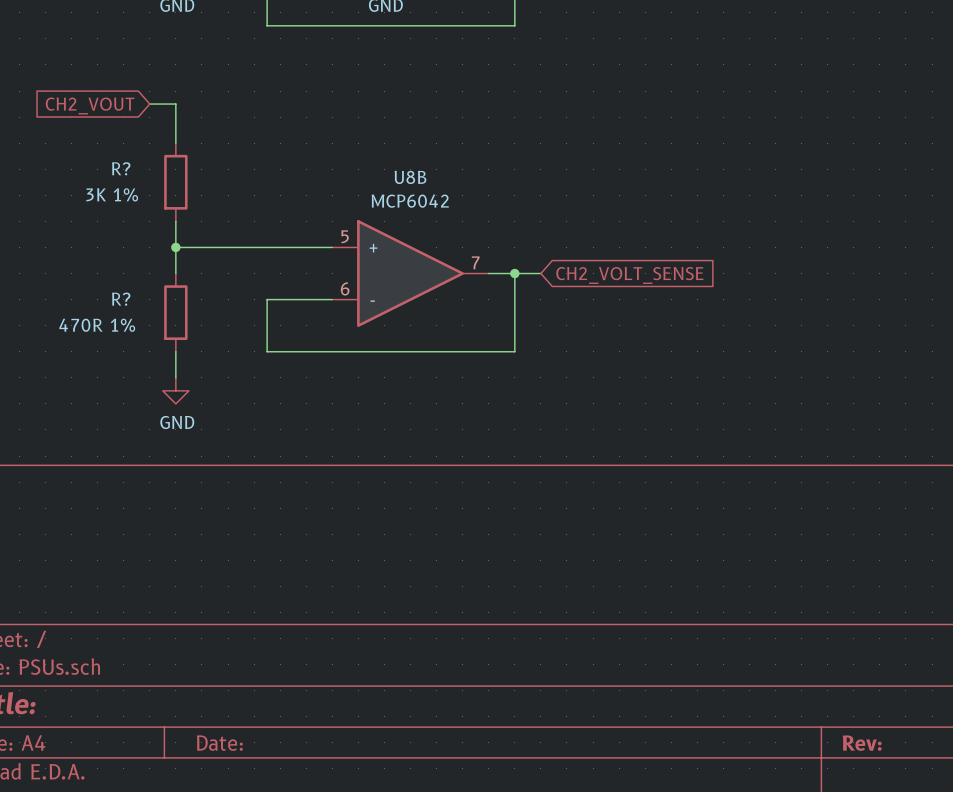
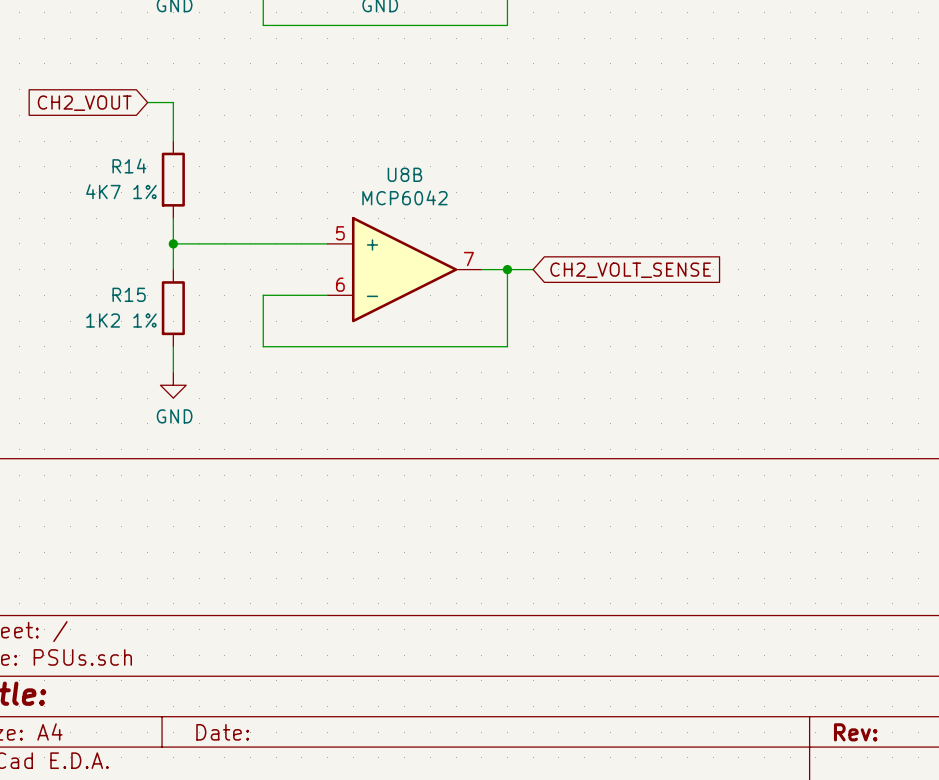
R? name: R? (121, 168) -> R14 (129, 166)
R? value: 3K 1% (112, 194) -> 4K7 1% (121, 191)
R? name: R? (121, 299) -> R15 (129, 294)
R? value: 470R 1% (97, 325) -> 1K2 1% (121, 320)

